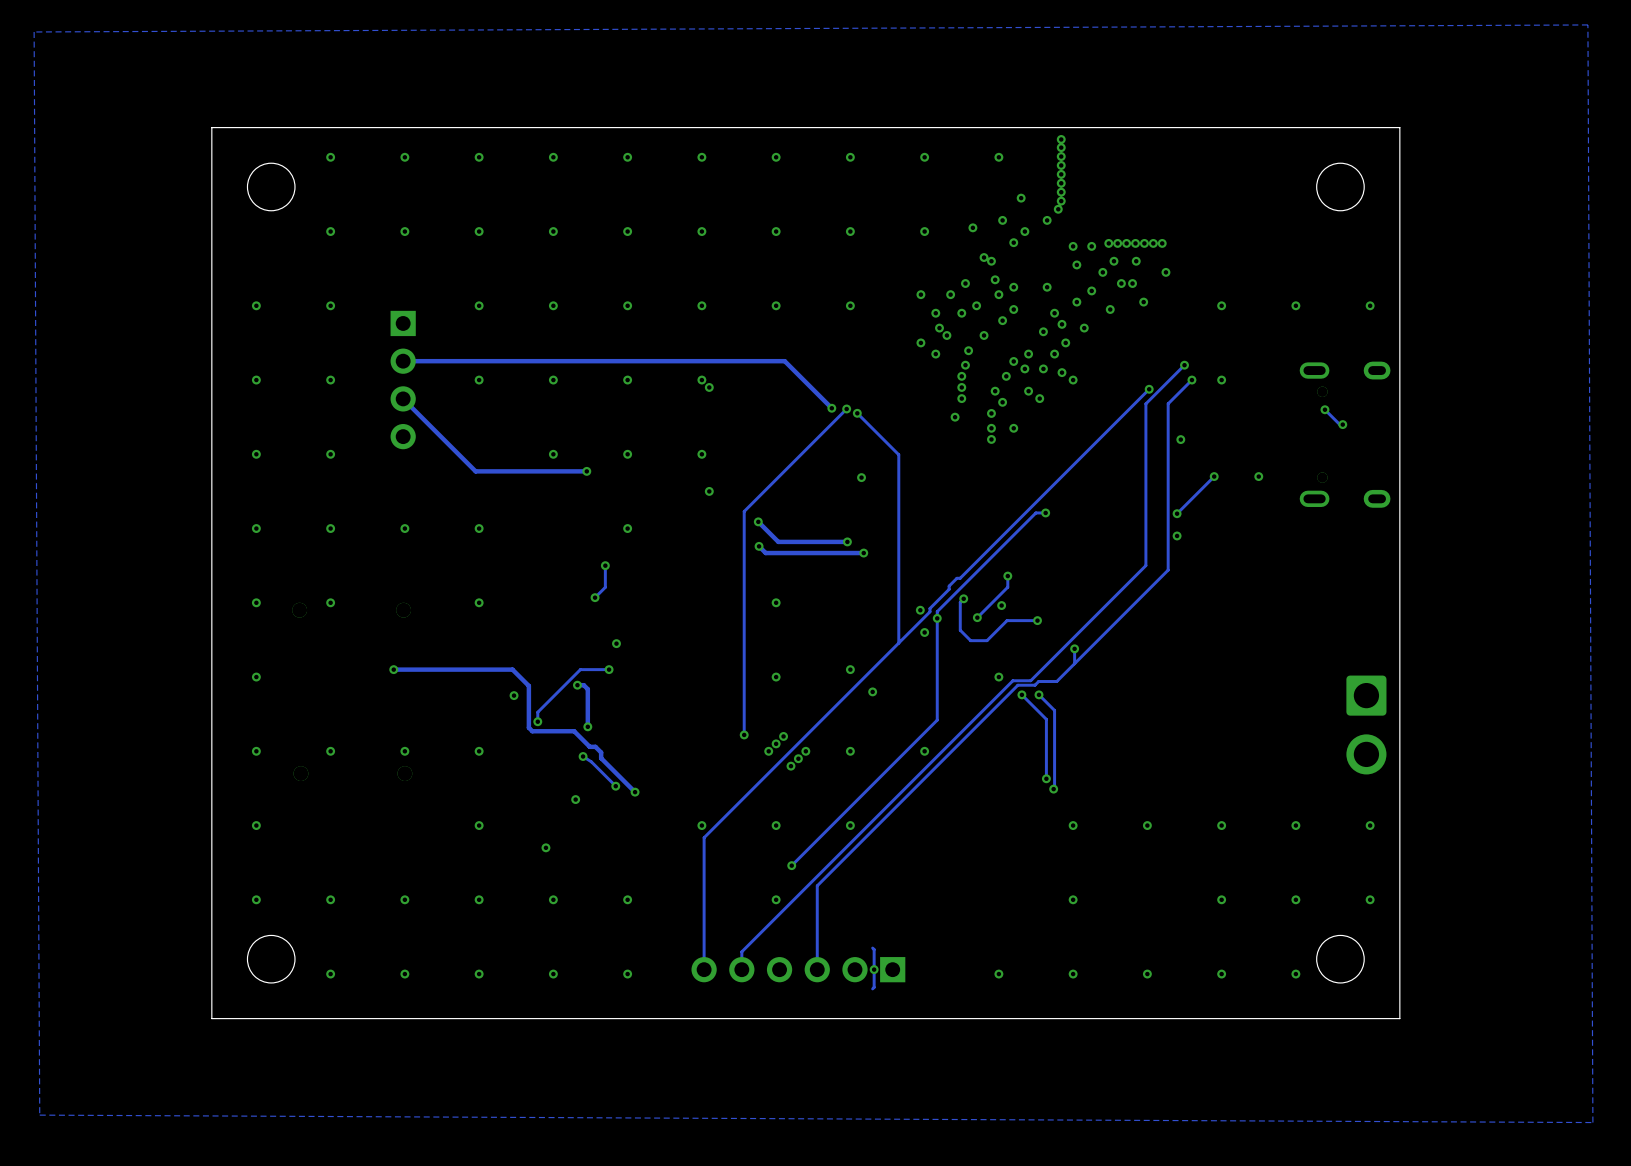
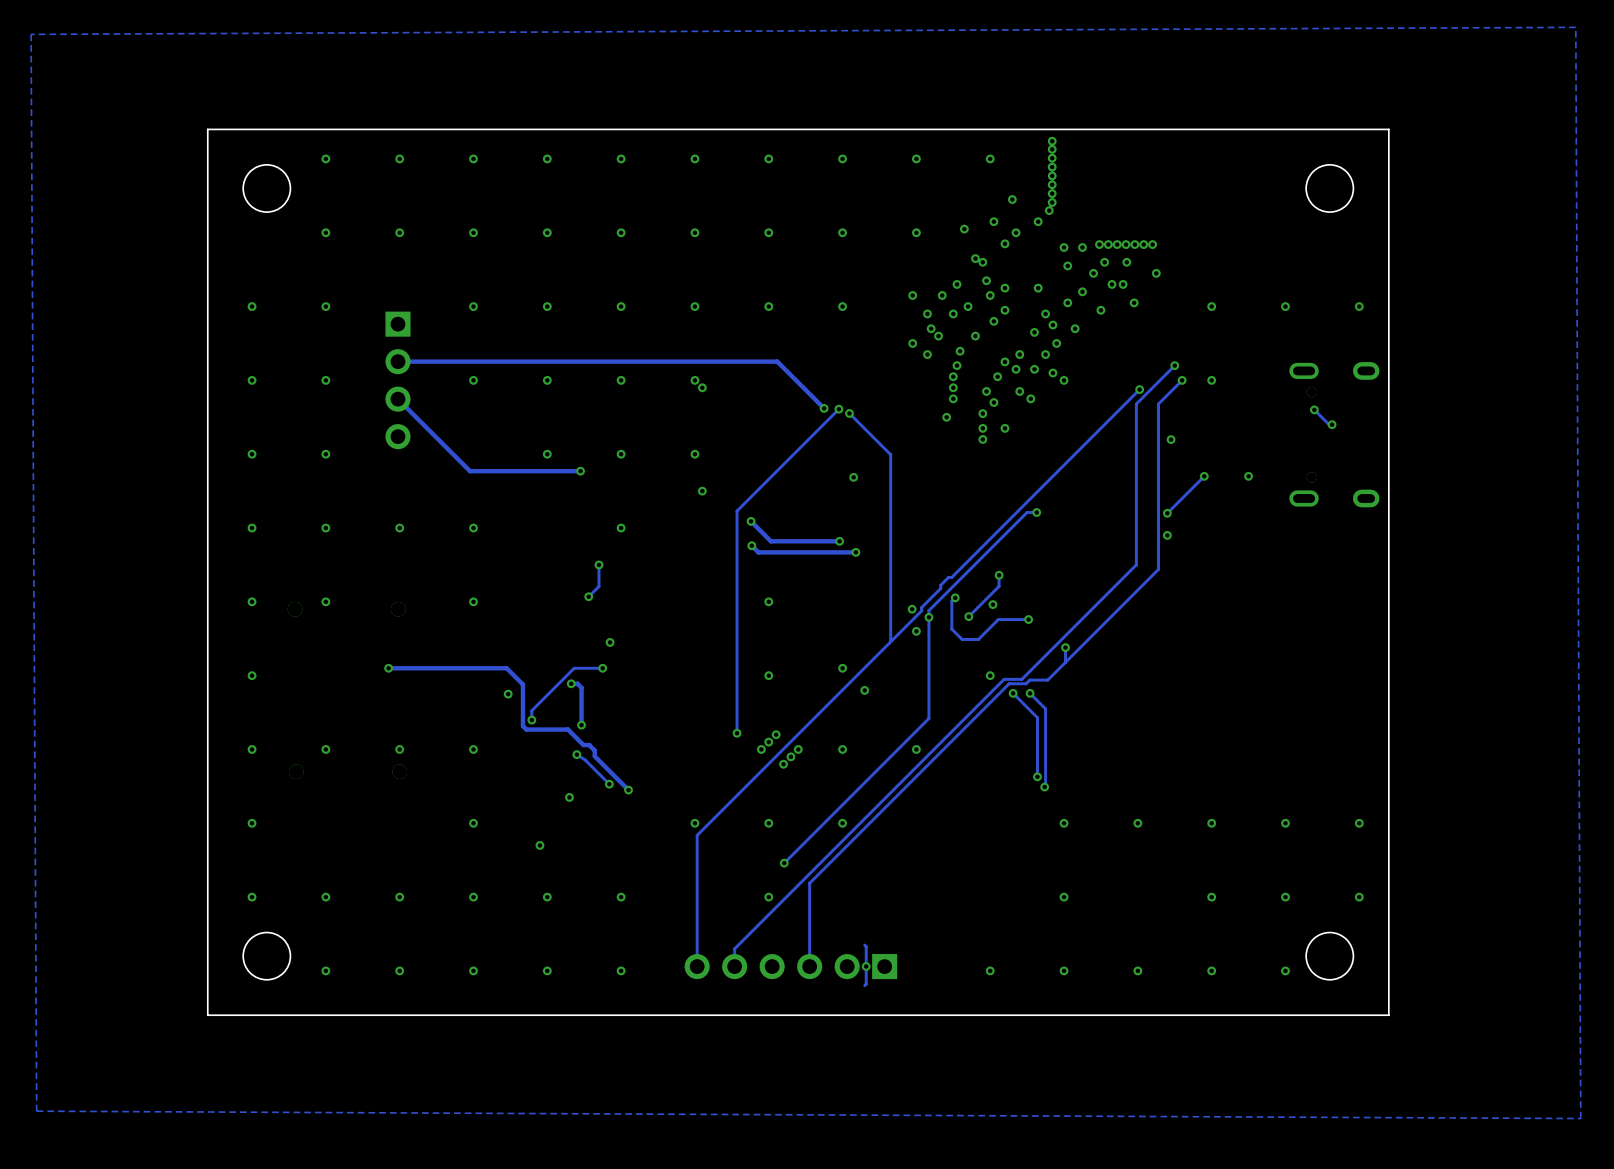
part: (1366, 725) -> none

